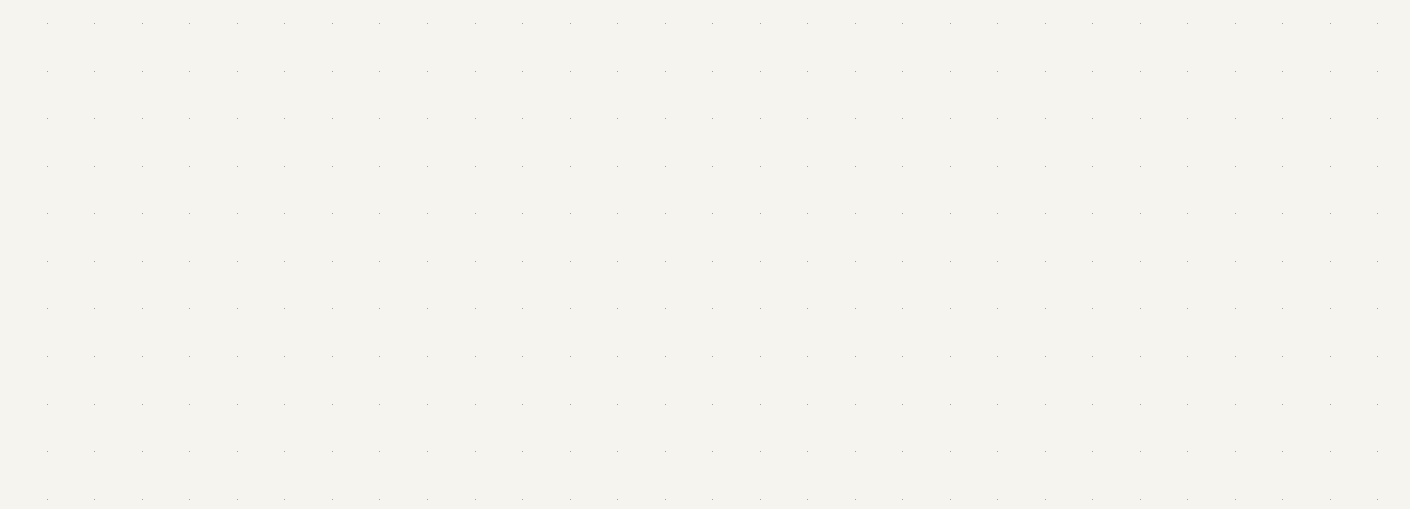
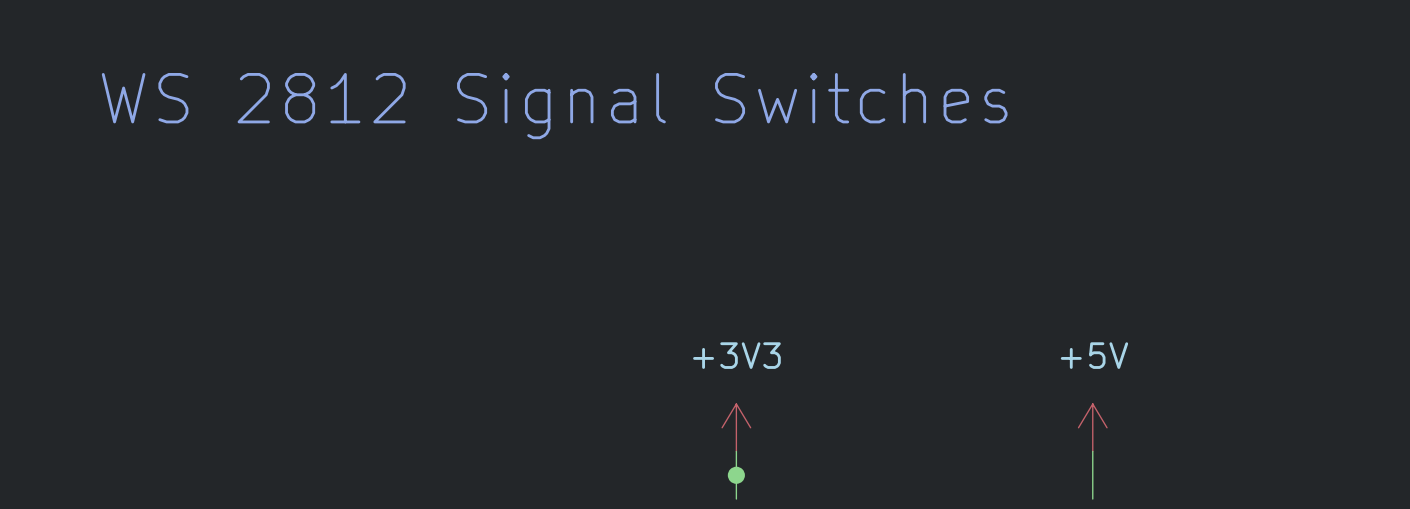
text: none -> WS 2812 Signal Switches (554, 106)
power symbol: none -> +3V3 (736, 427)
power symbol: none -> +5V (1092, 427)
wire: none -> (736, 451) (736, 499)
wire: none -> (1092, 451) (1092, 499)
junction: none -> (736, 475)

